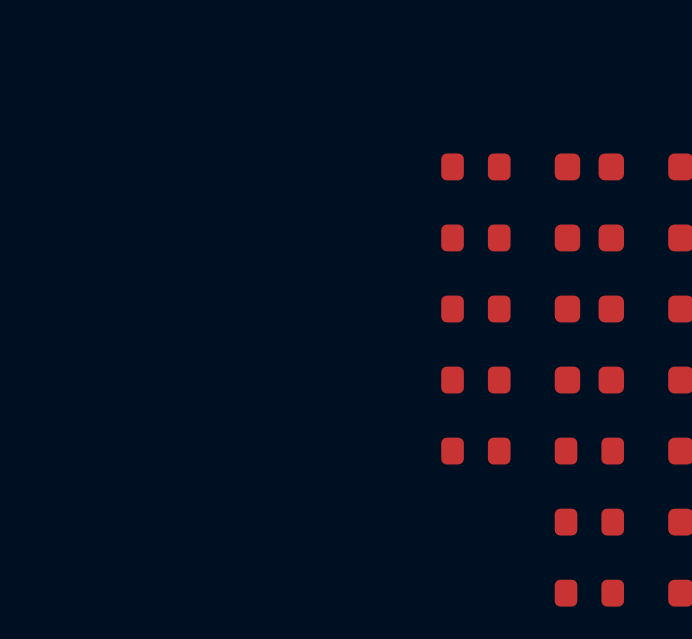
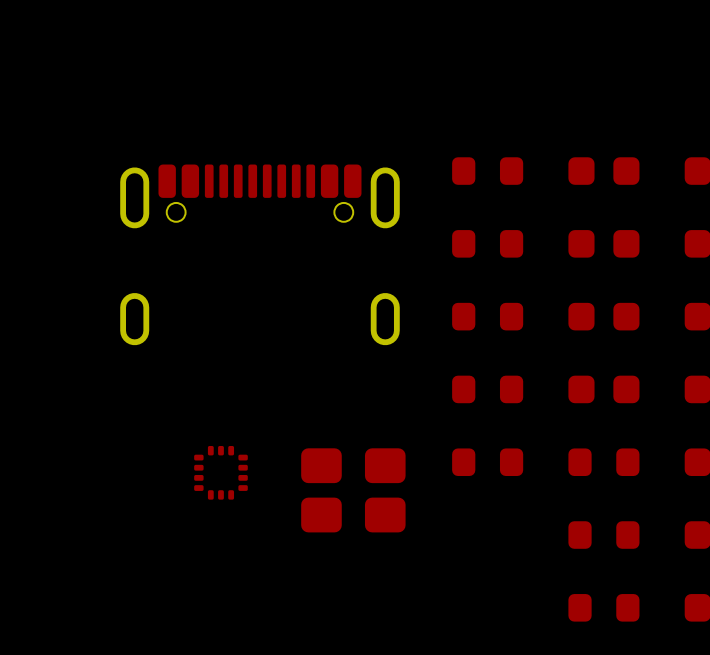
part: none -> (259, 254)
part: none -> (220, 472)
part: none -> (353, 490)

